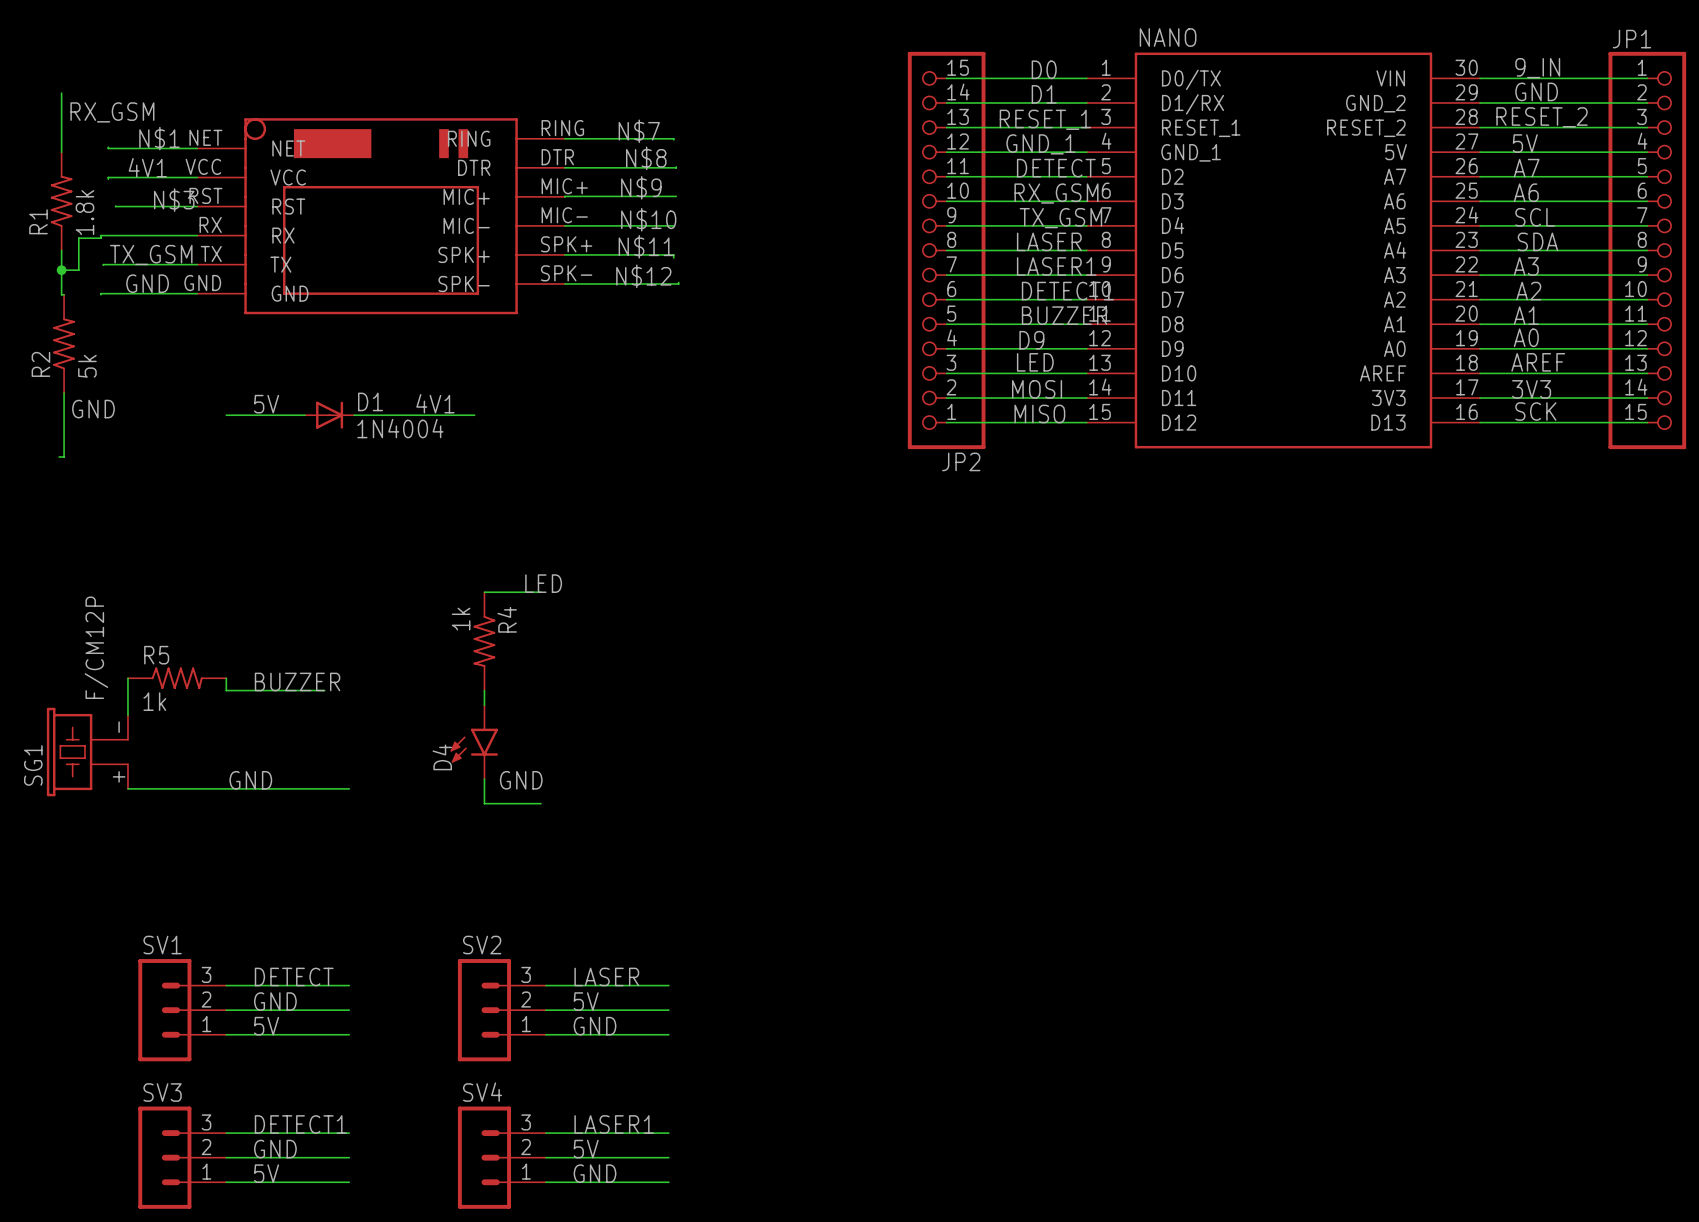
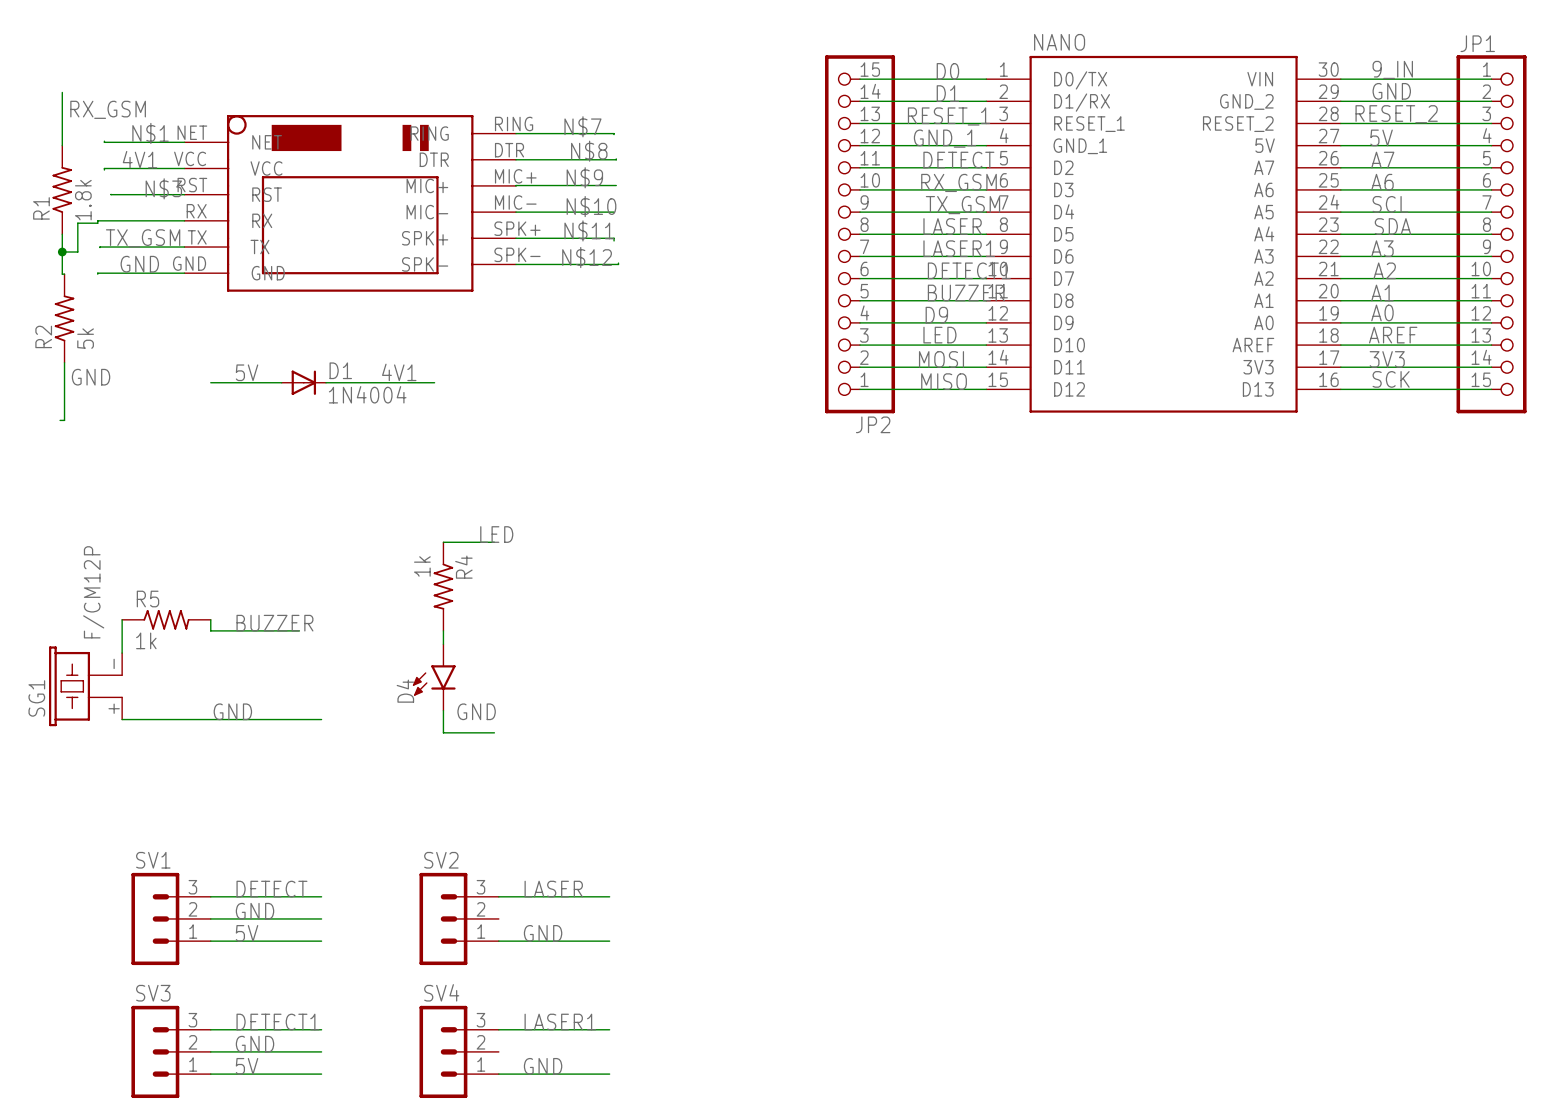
label: 5V (586, 1001) -> none
wire: (545, 1010) (668, 1010) -> none
label: 5V (586, 1149) -> none
wire: (545, 1157) (668, 1157) -> none

